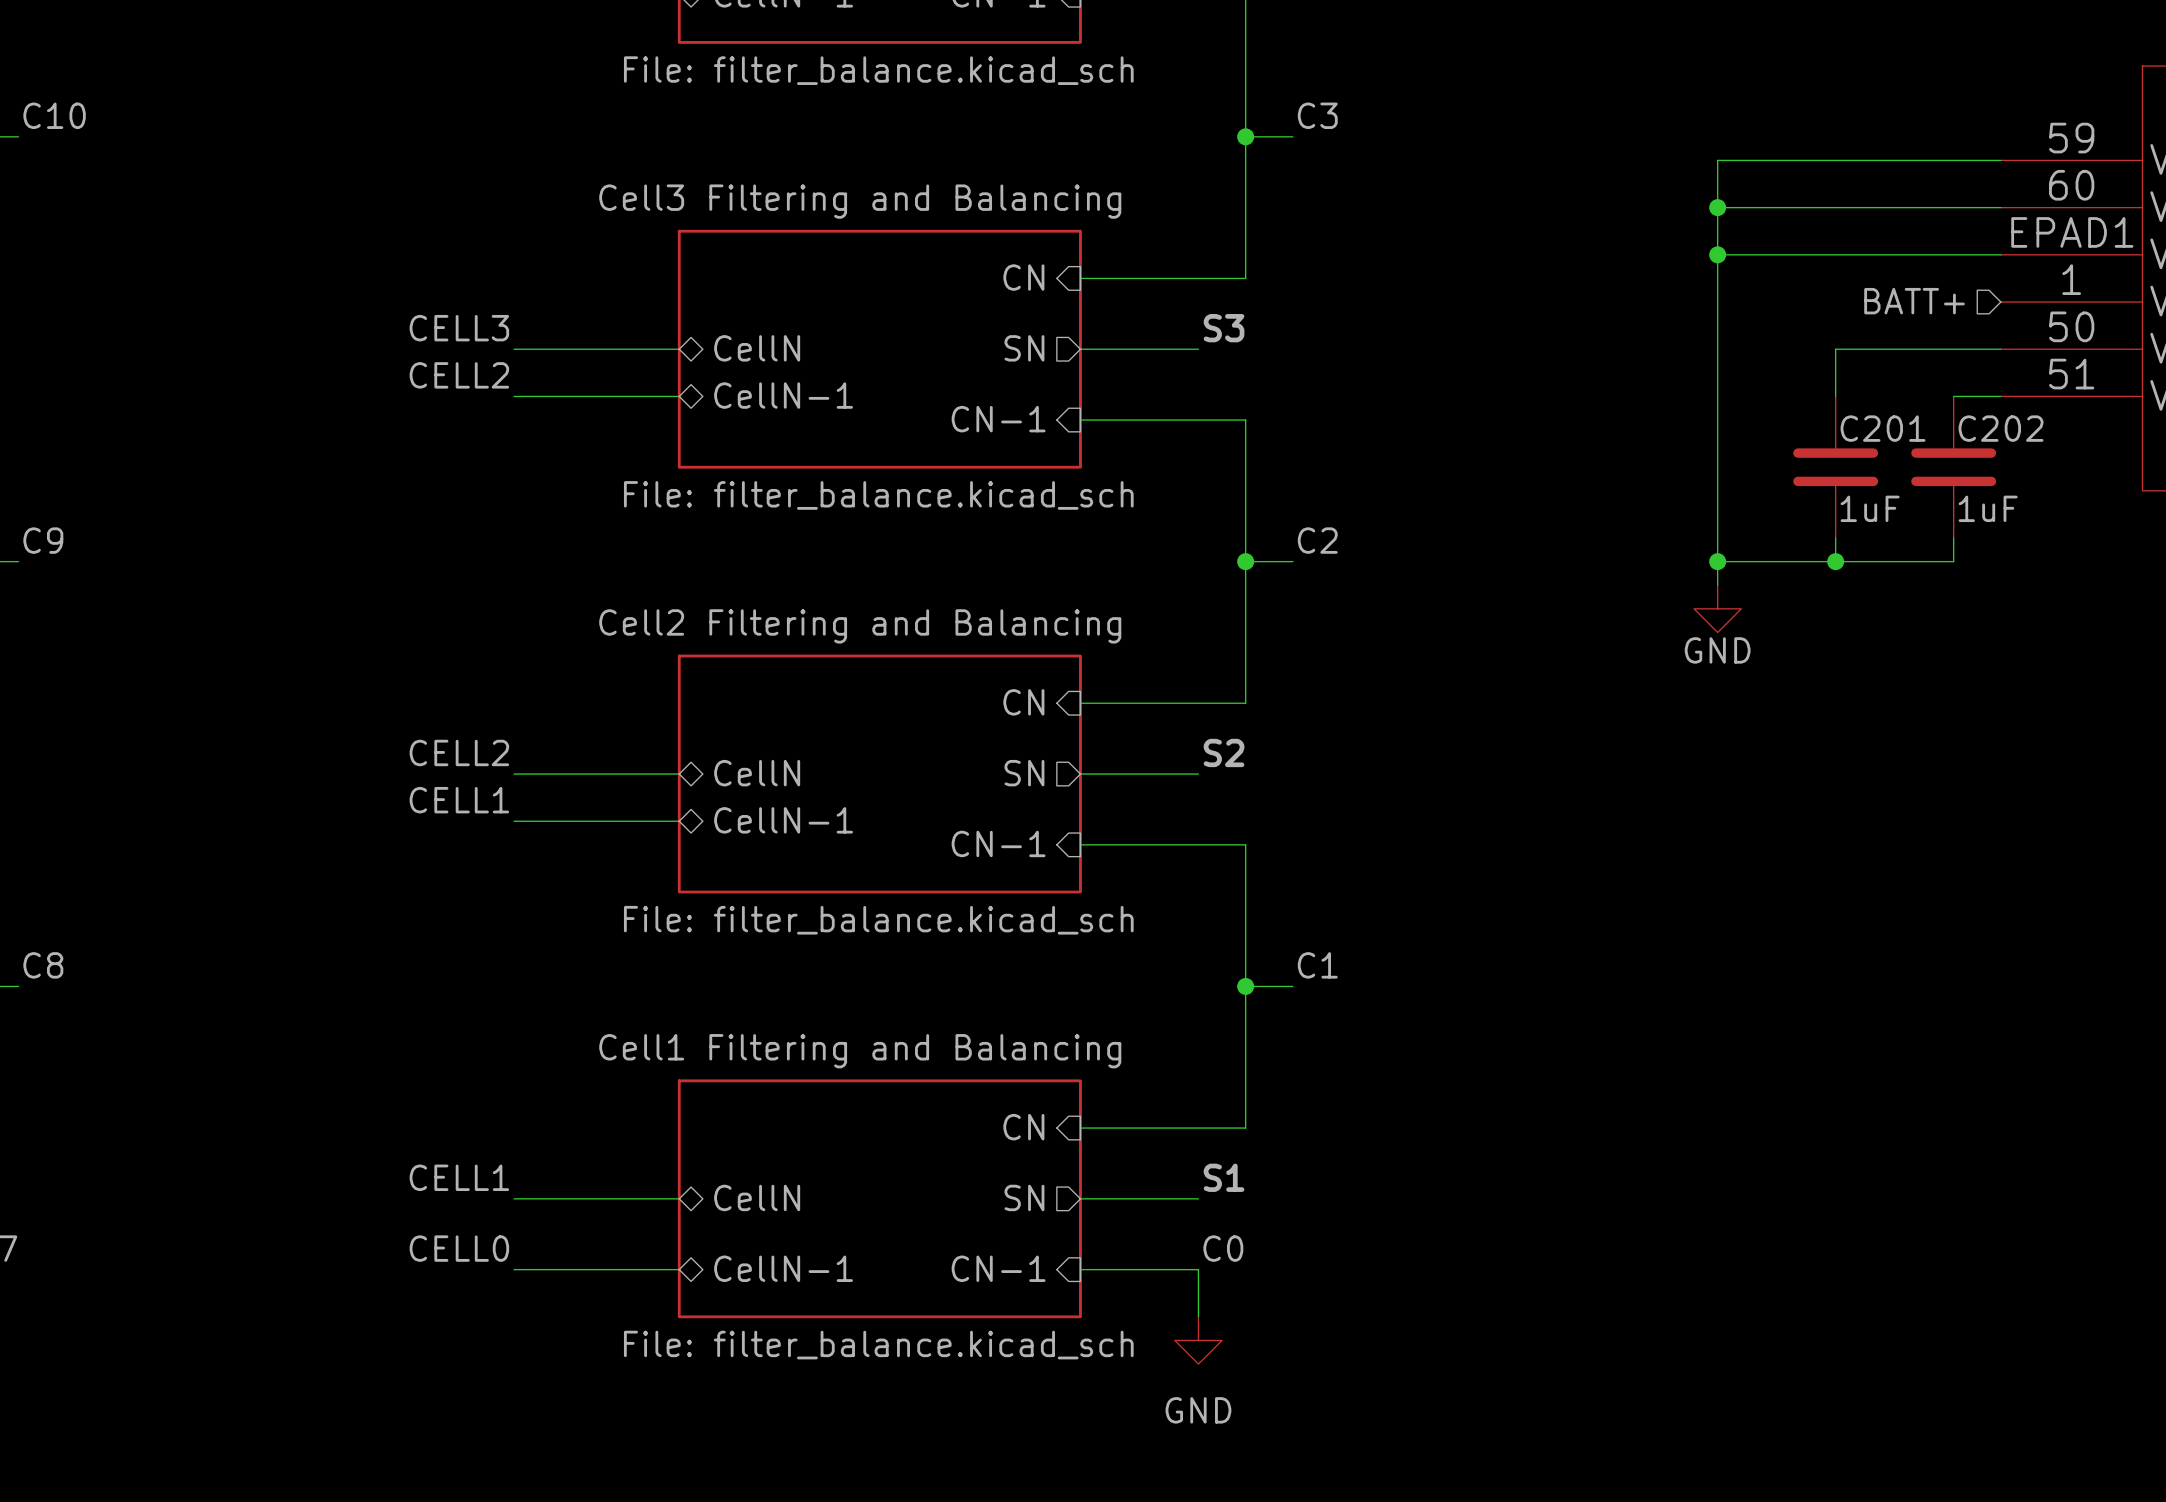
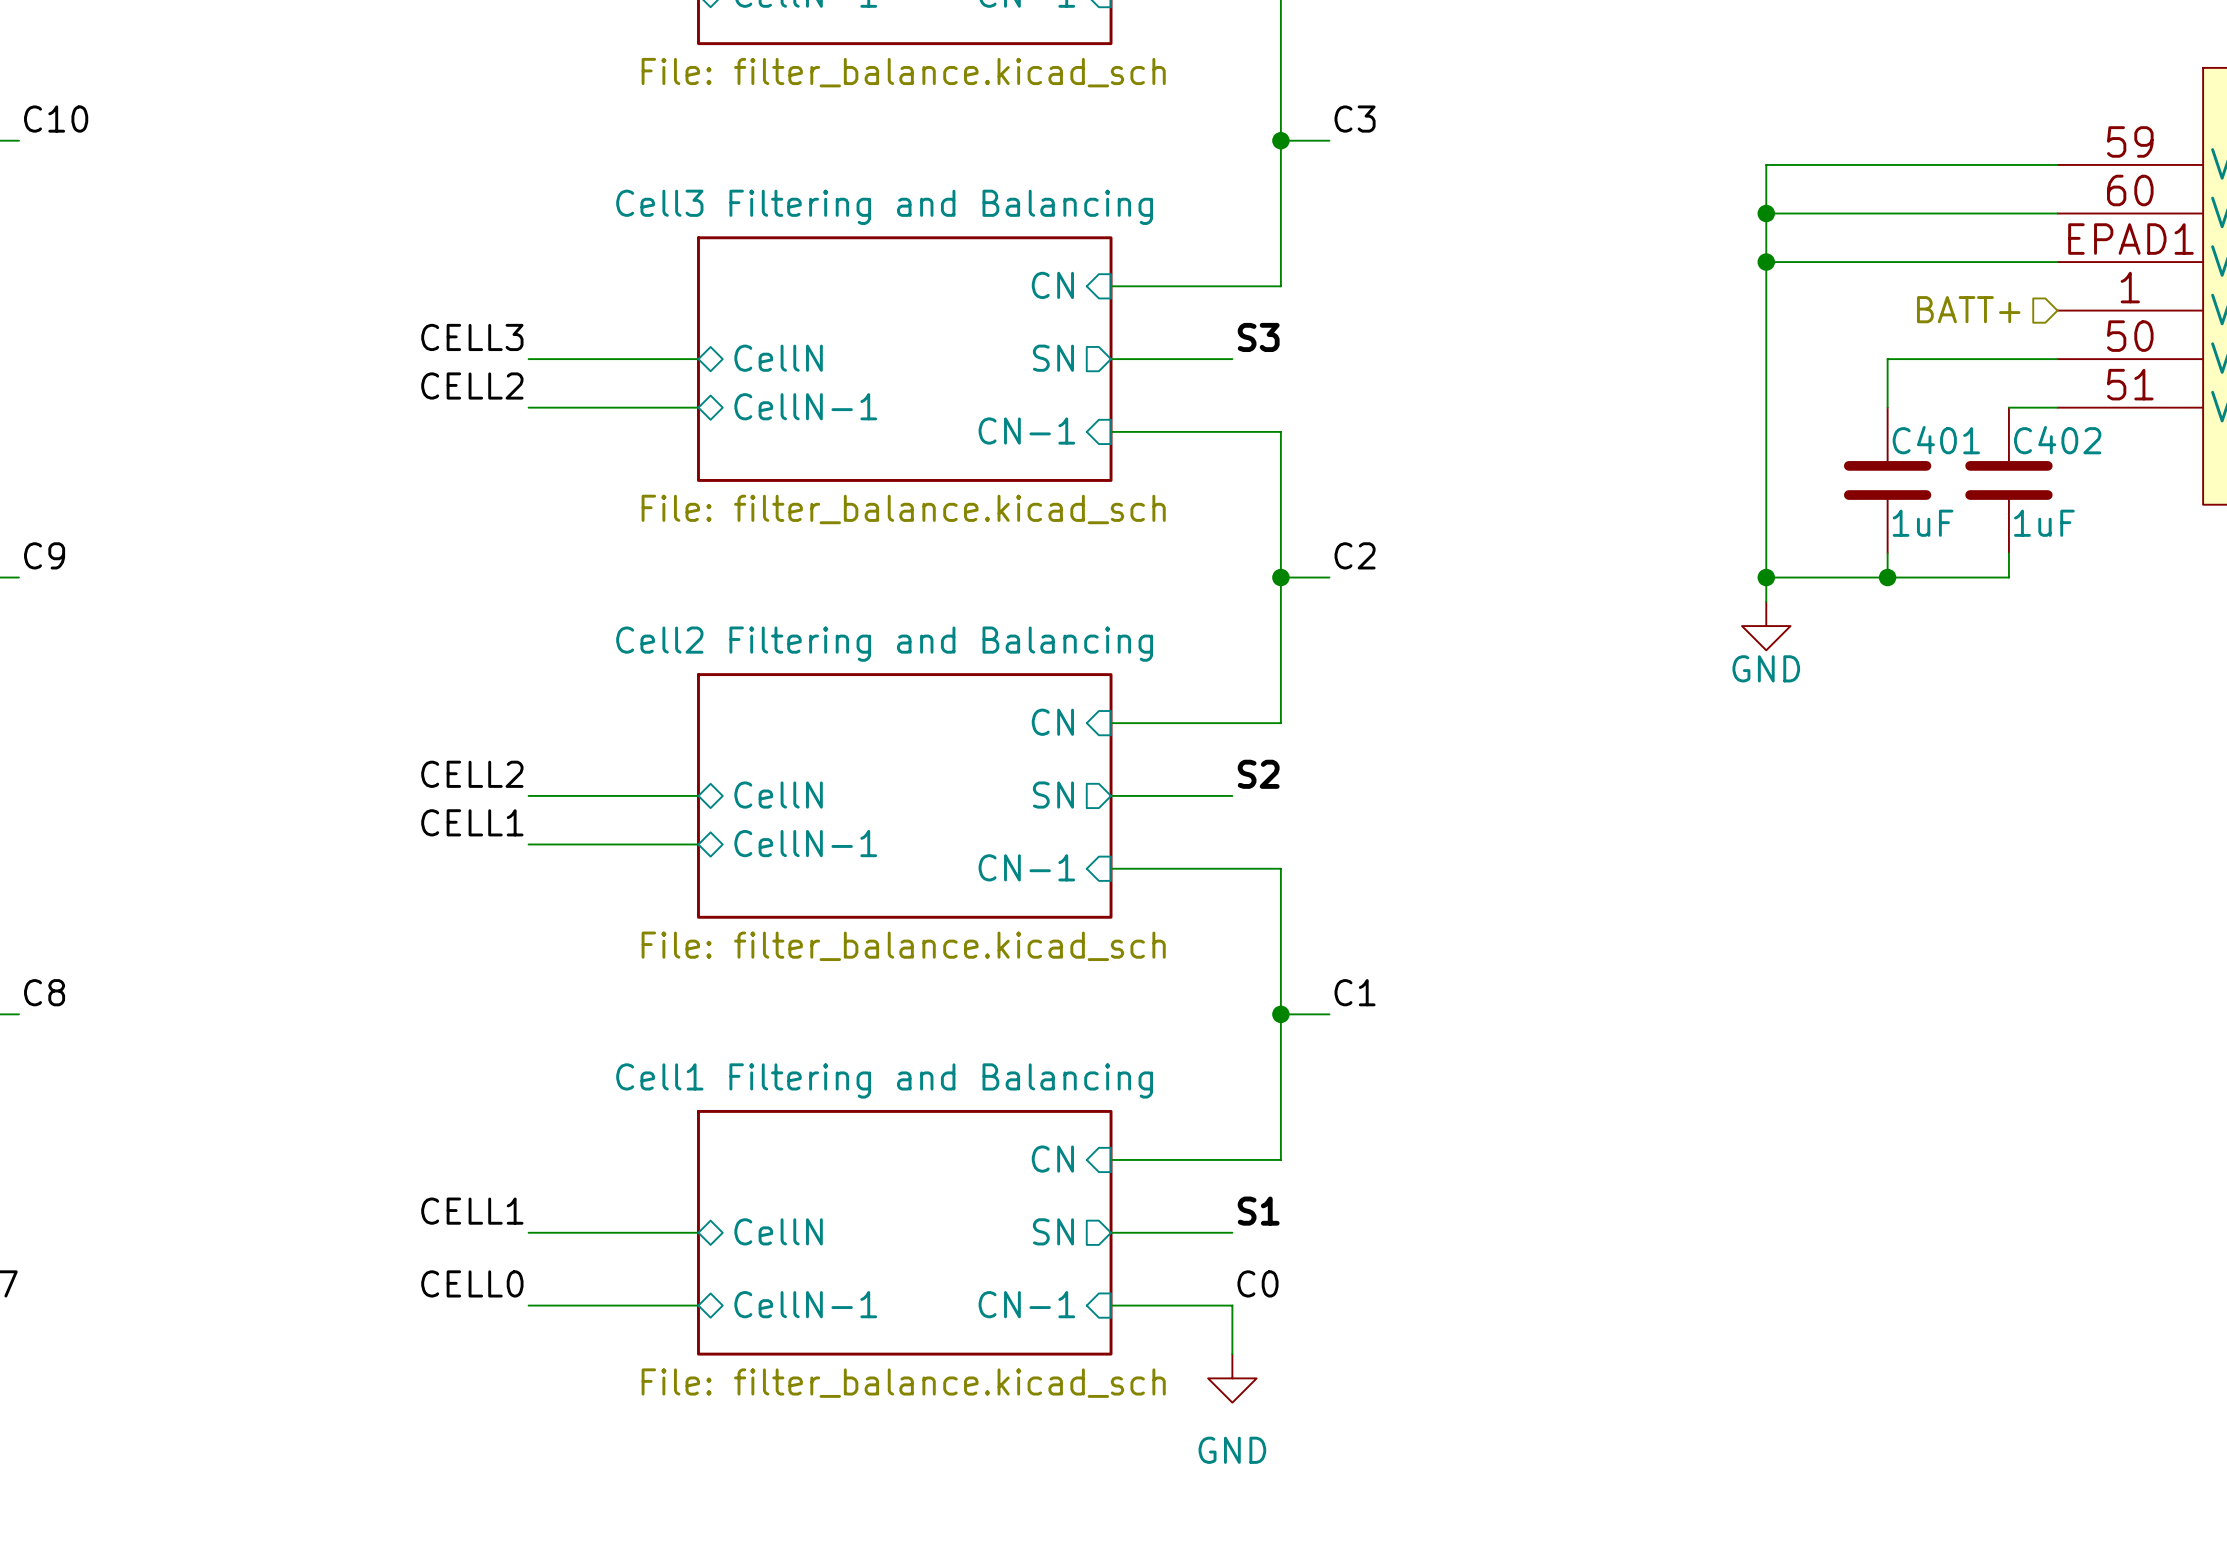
C201 name: C201 (1883, 428) -> C401 (1936, 440)
C202 name: C202 (2001, 428) -> C402 (2057, 440)

